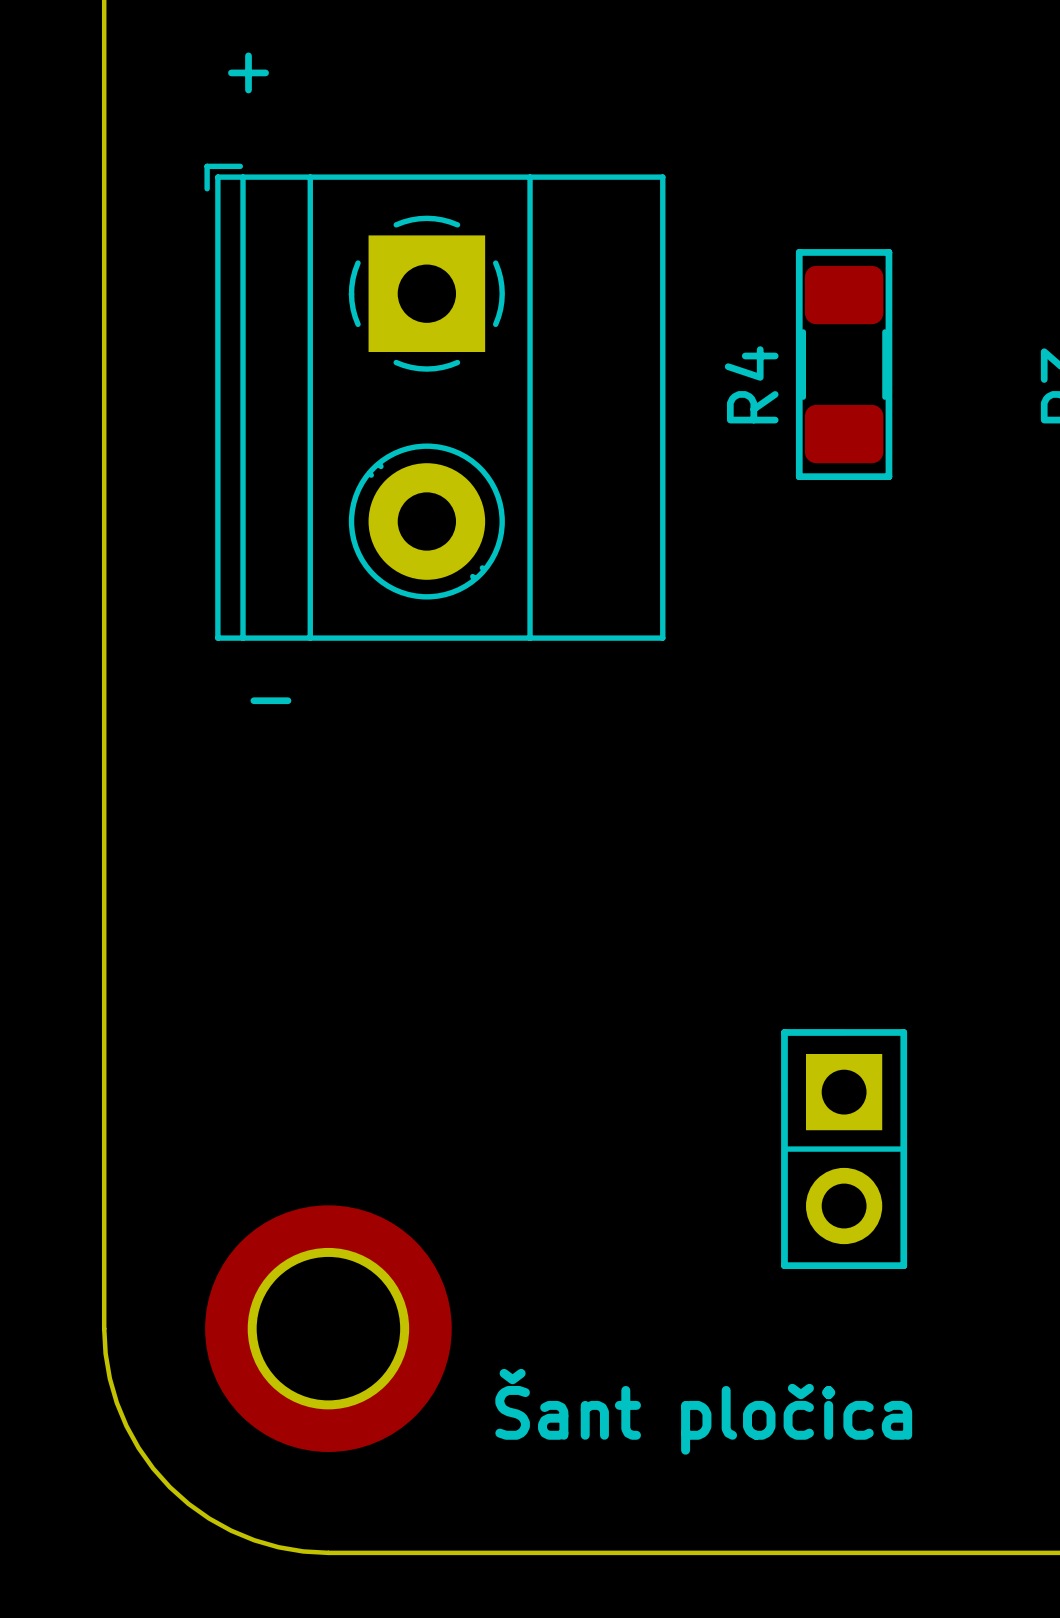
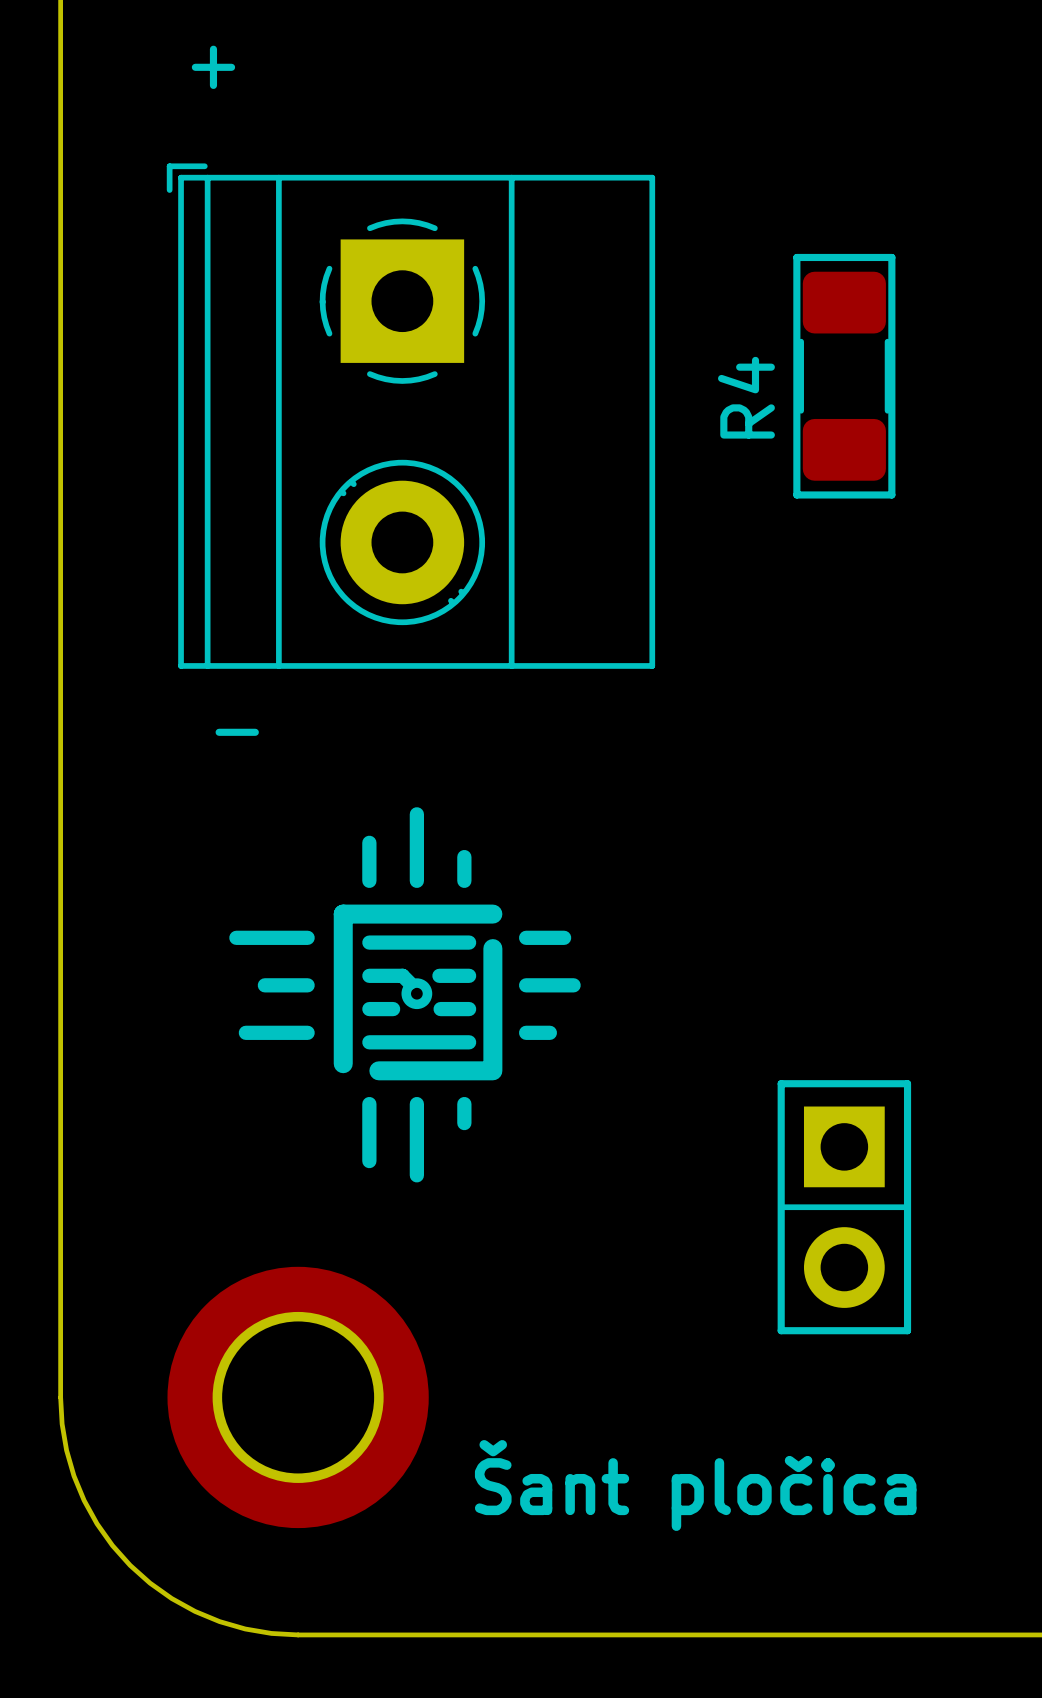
drawing: none -> [229, 807, 581, 1183]

